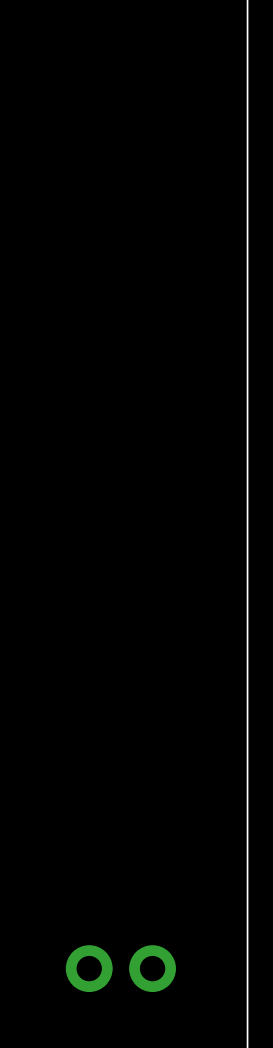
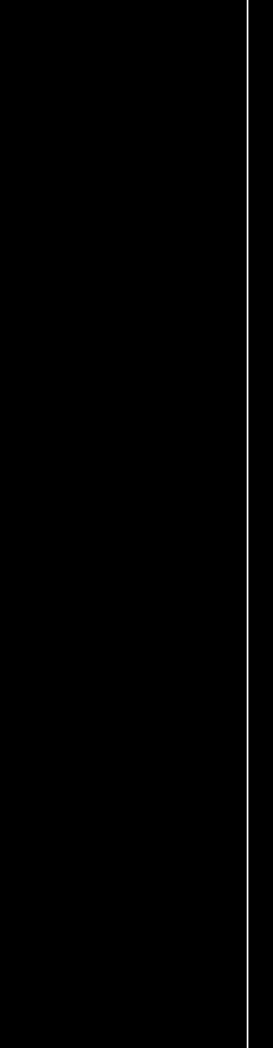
part: (120, 968) -> none

